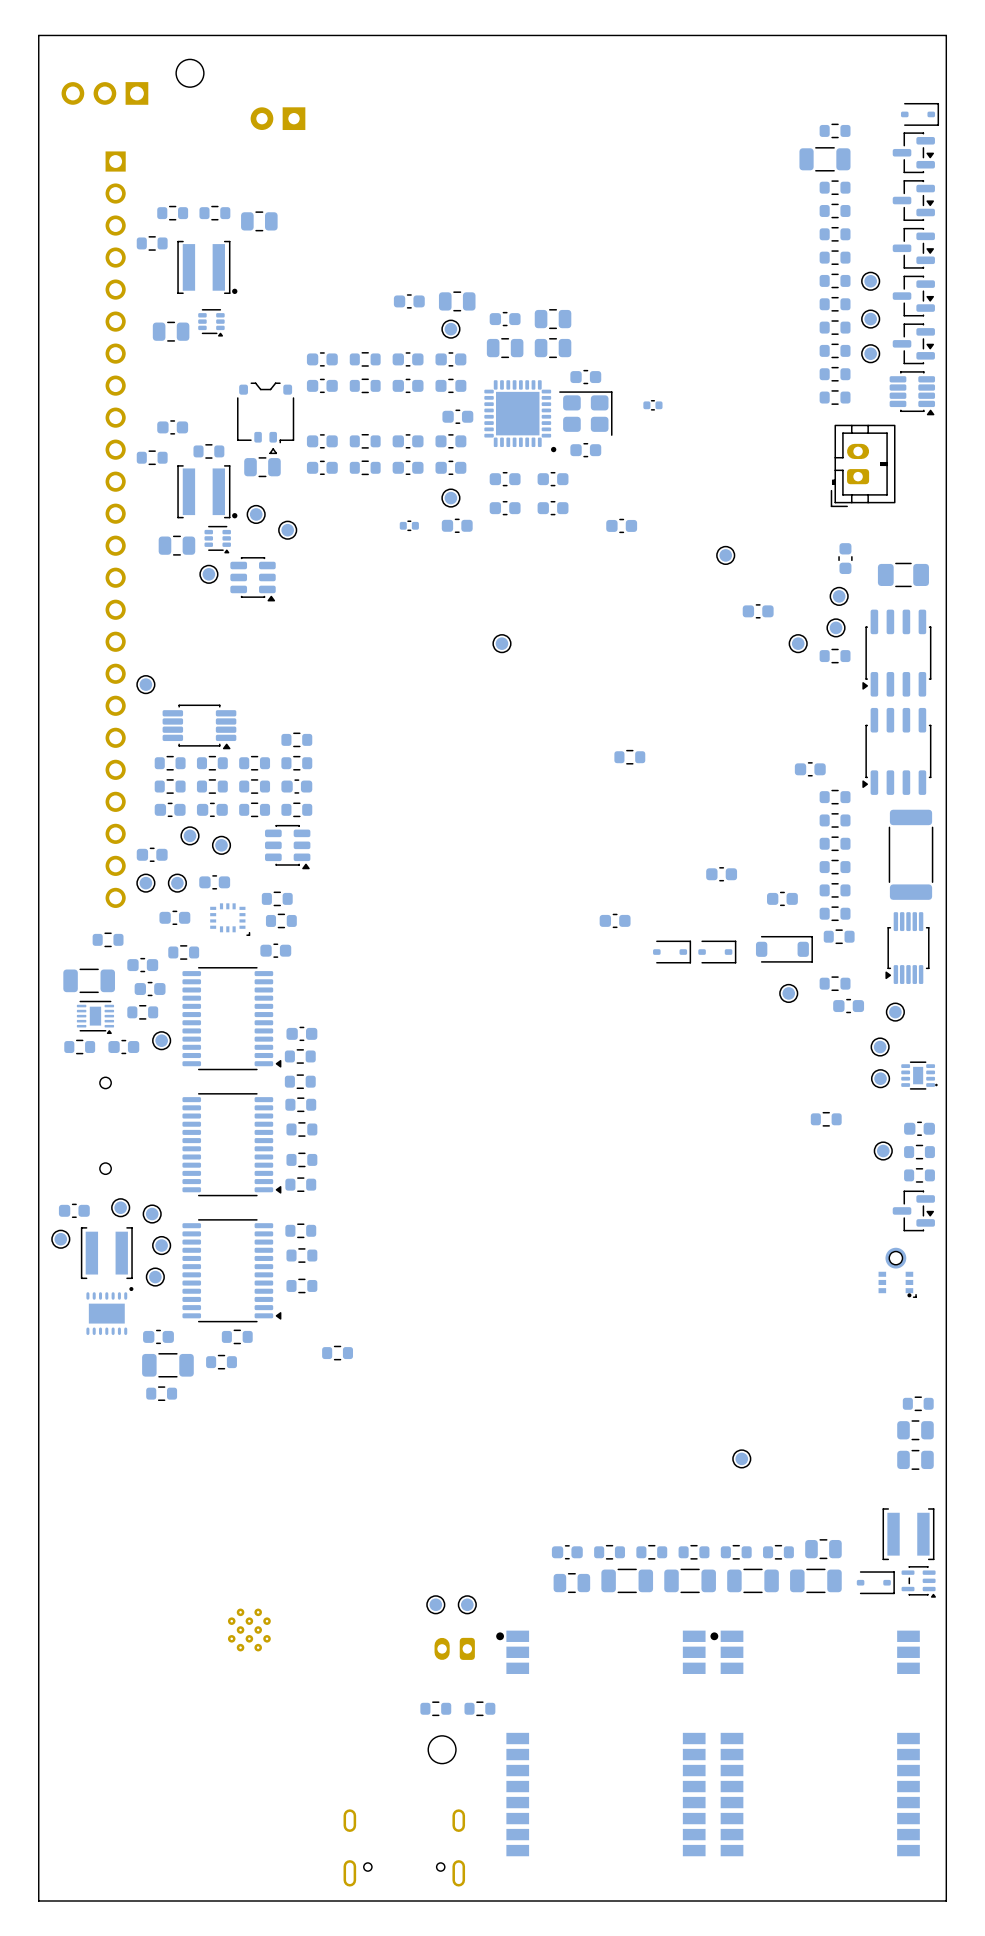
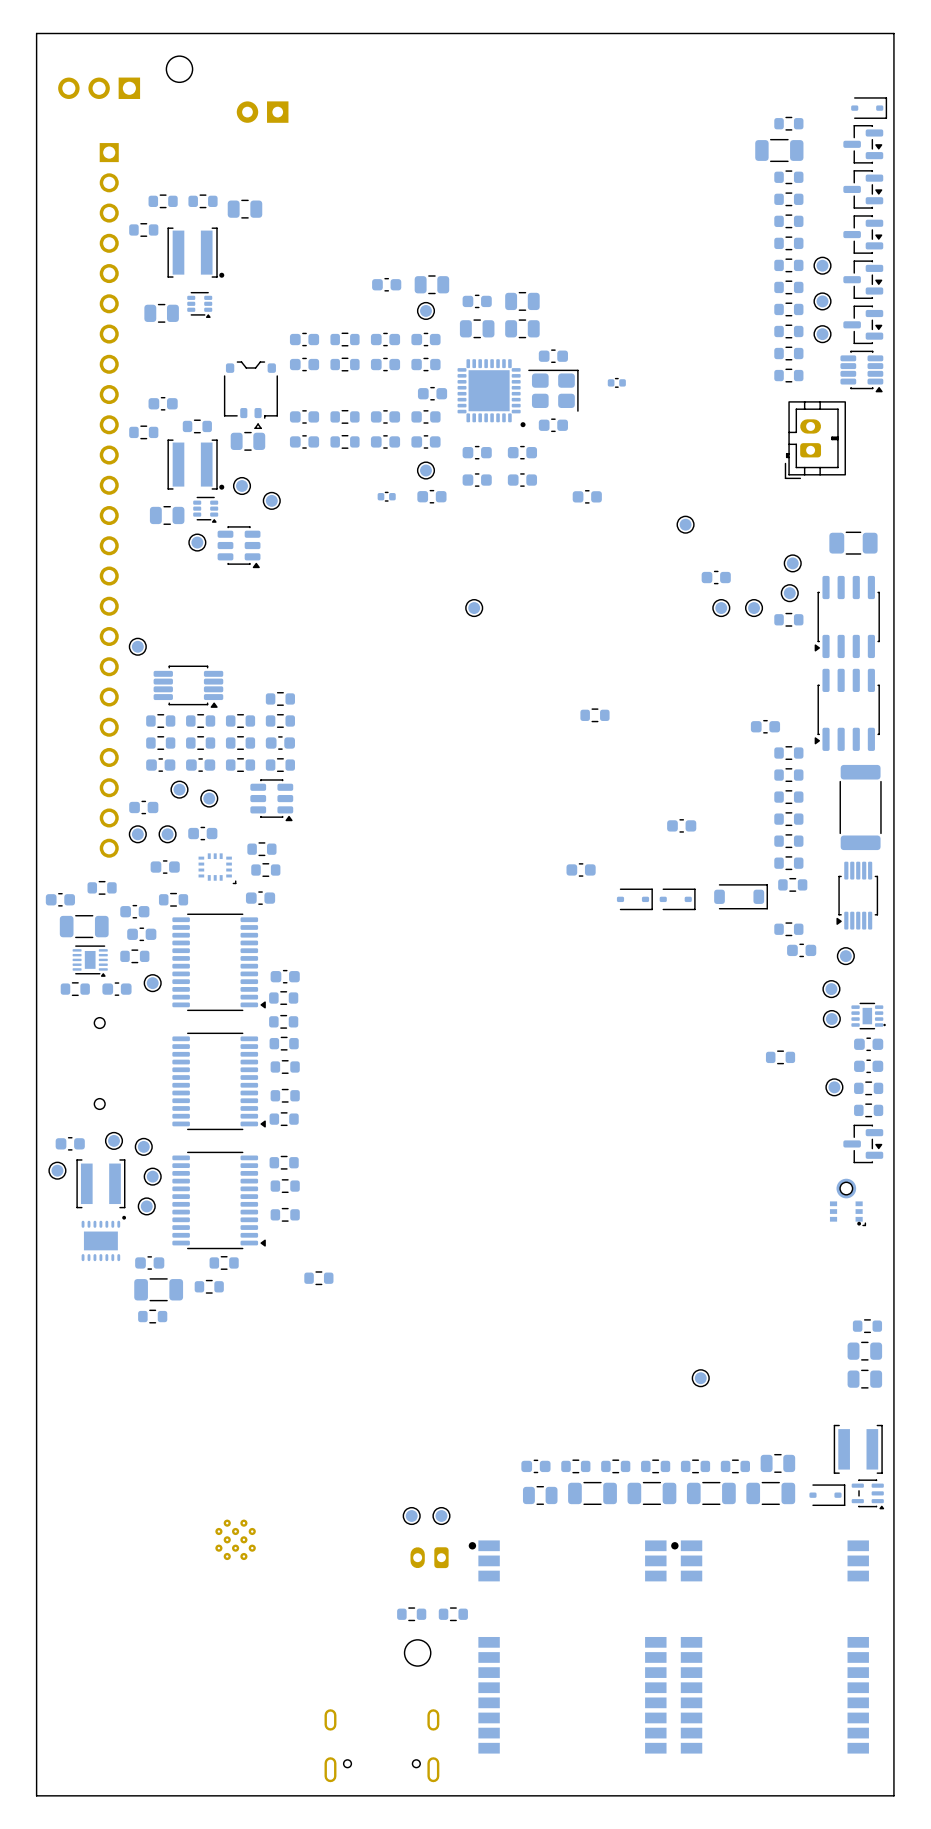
part: (845, 558) -> none
part: none -> (721, 608)
part position: (782, 898) -> (868, 1044)
part: none -> (60, 899)
part: (788, 993) -> none

